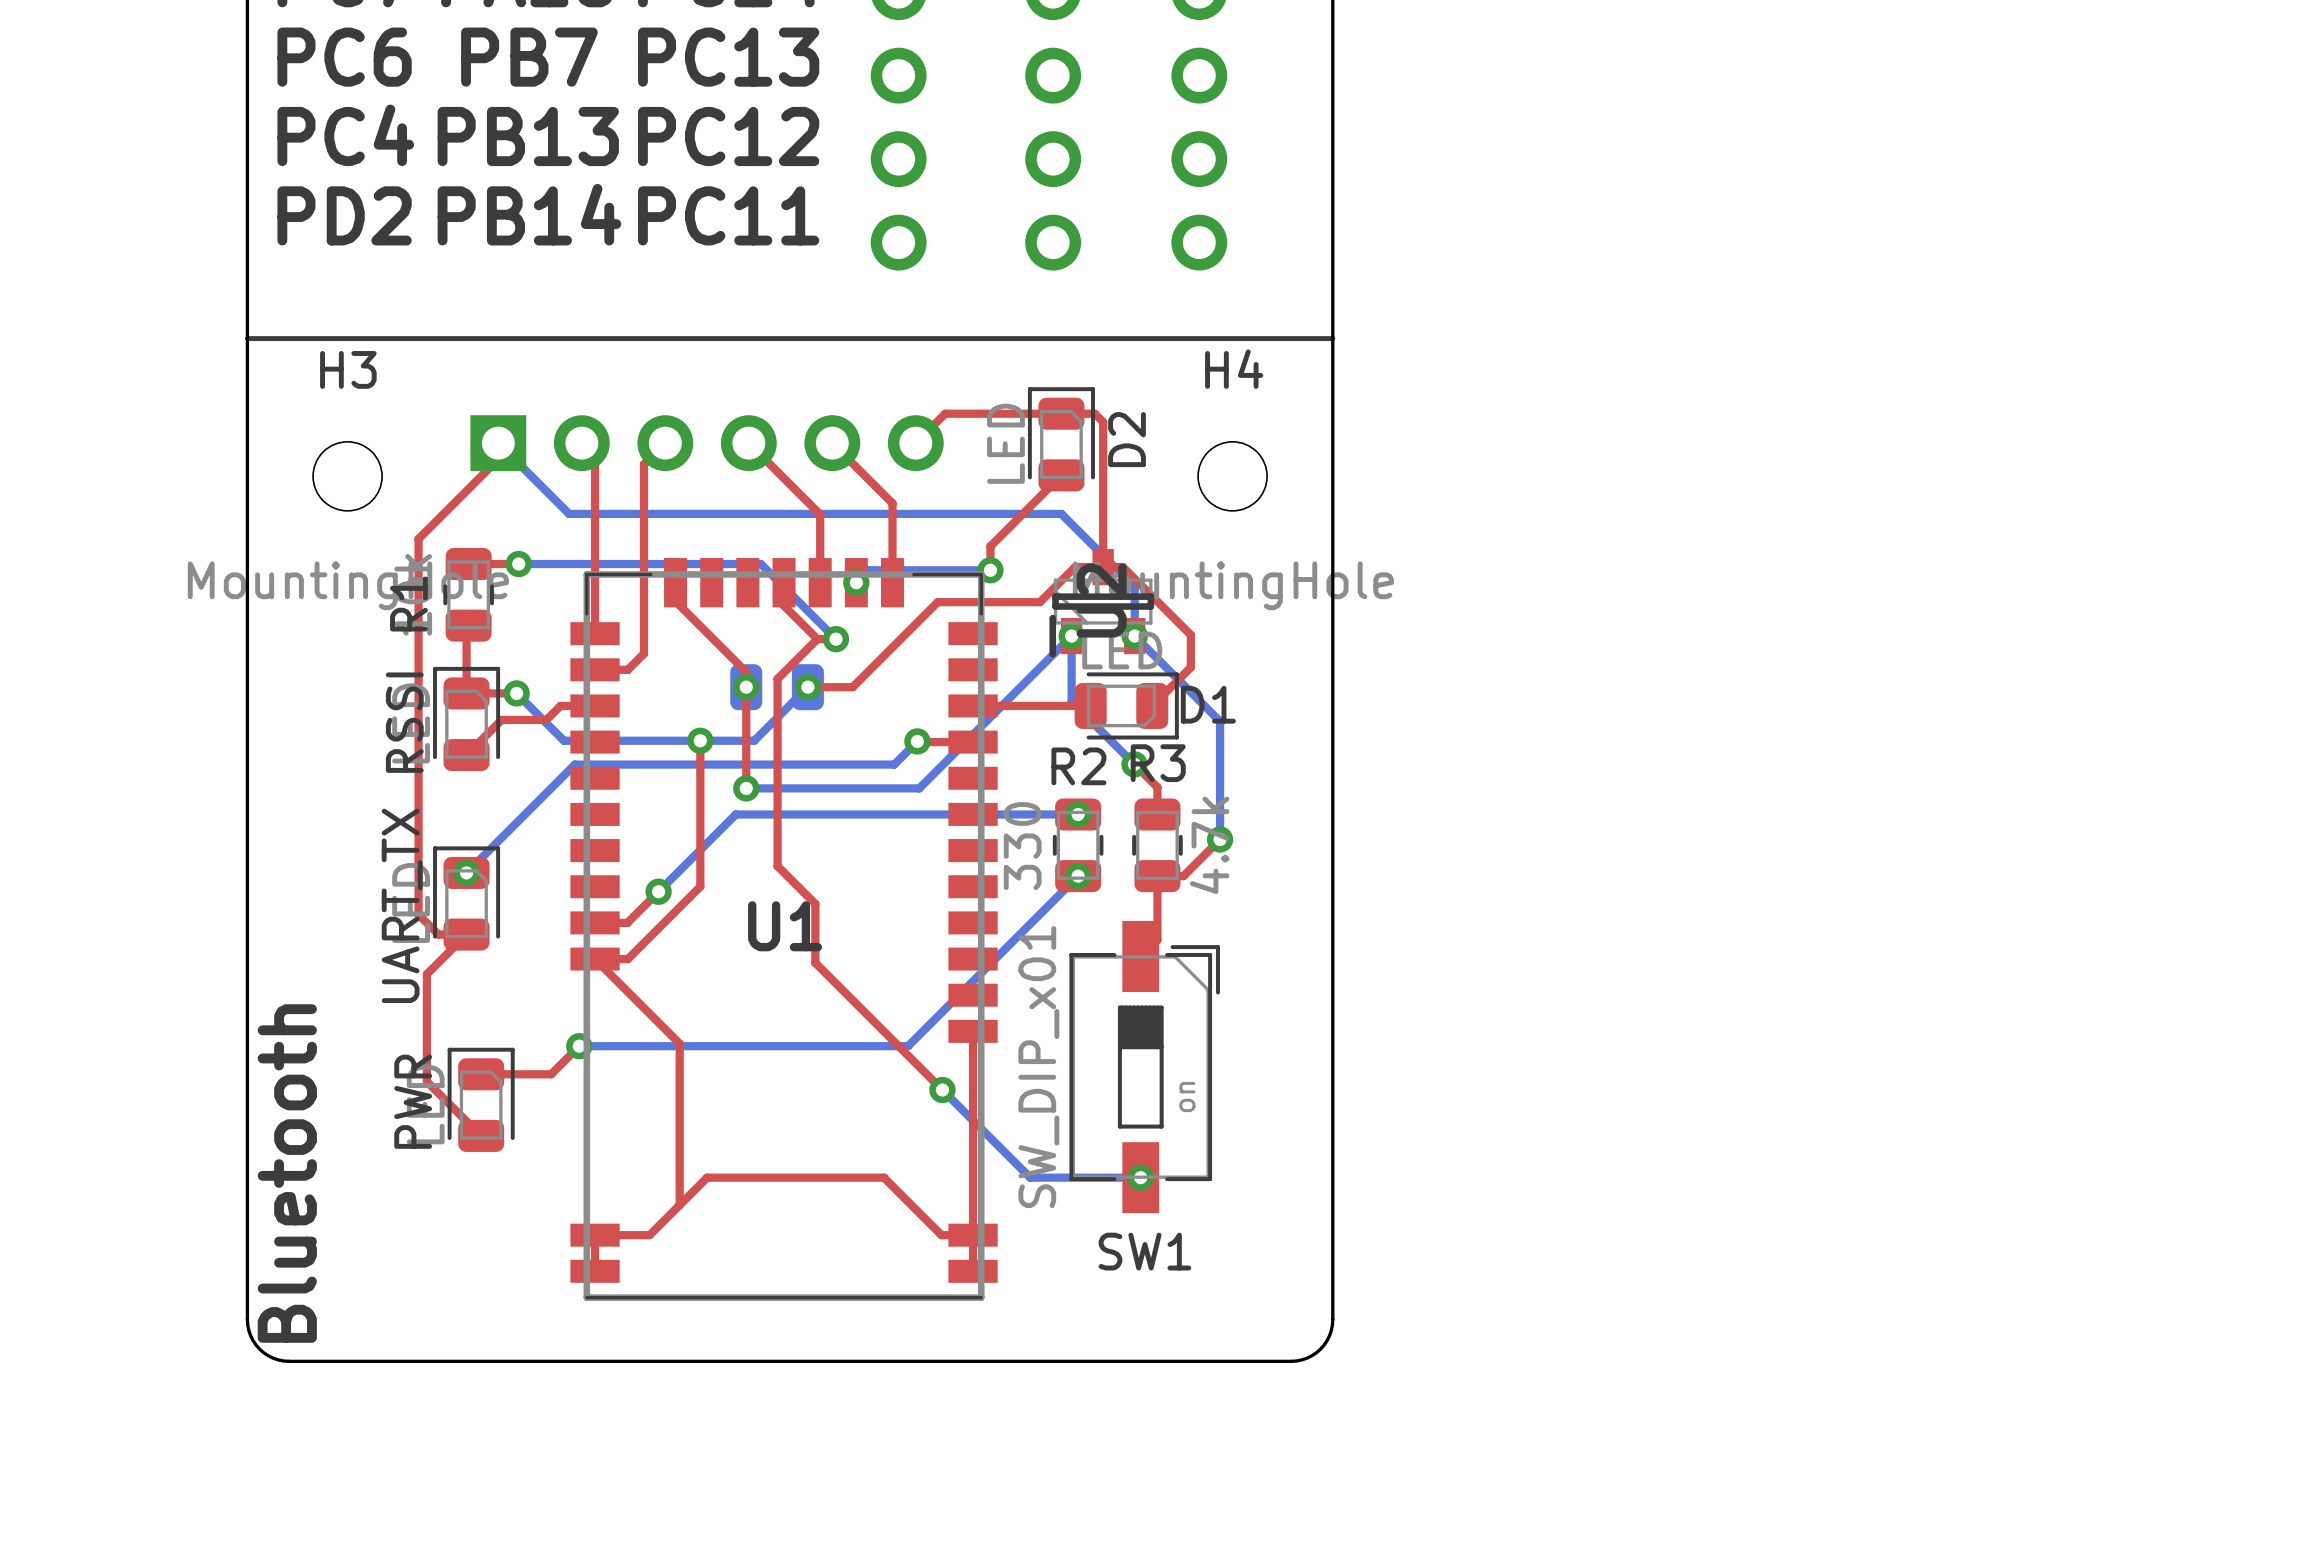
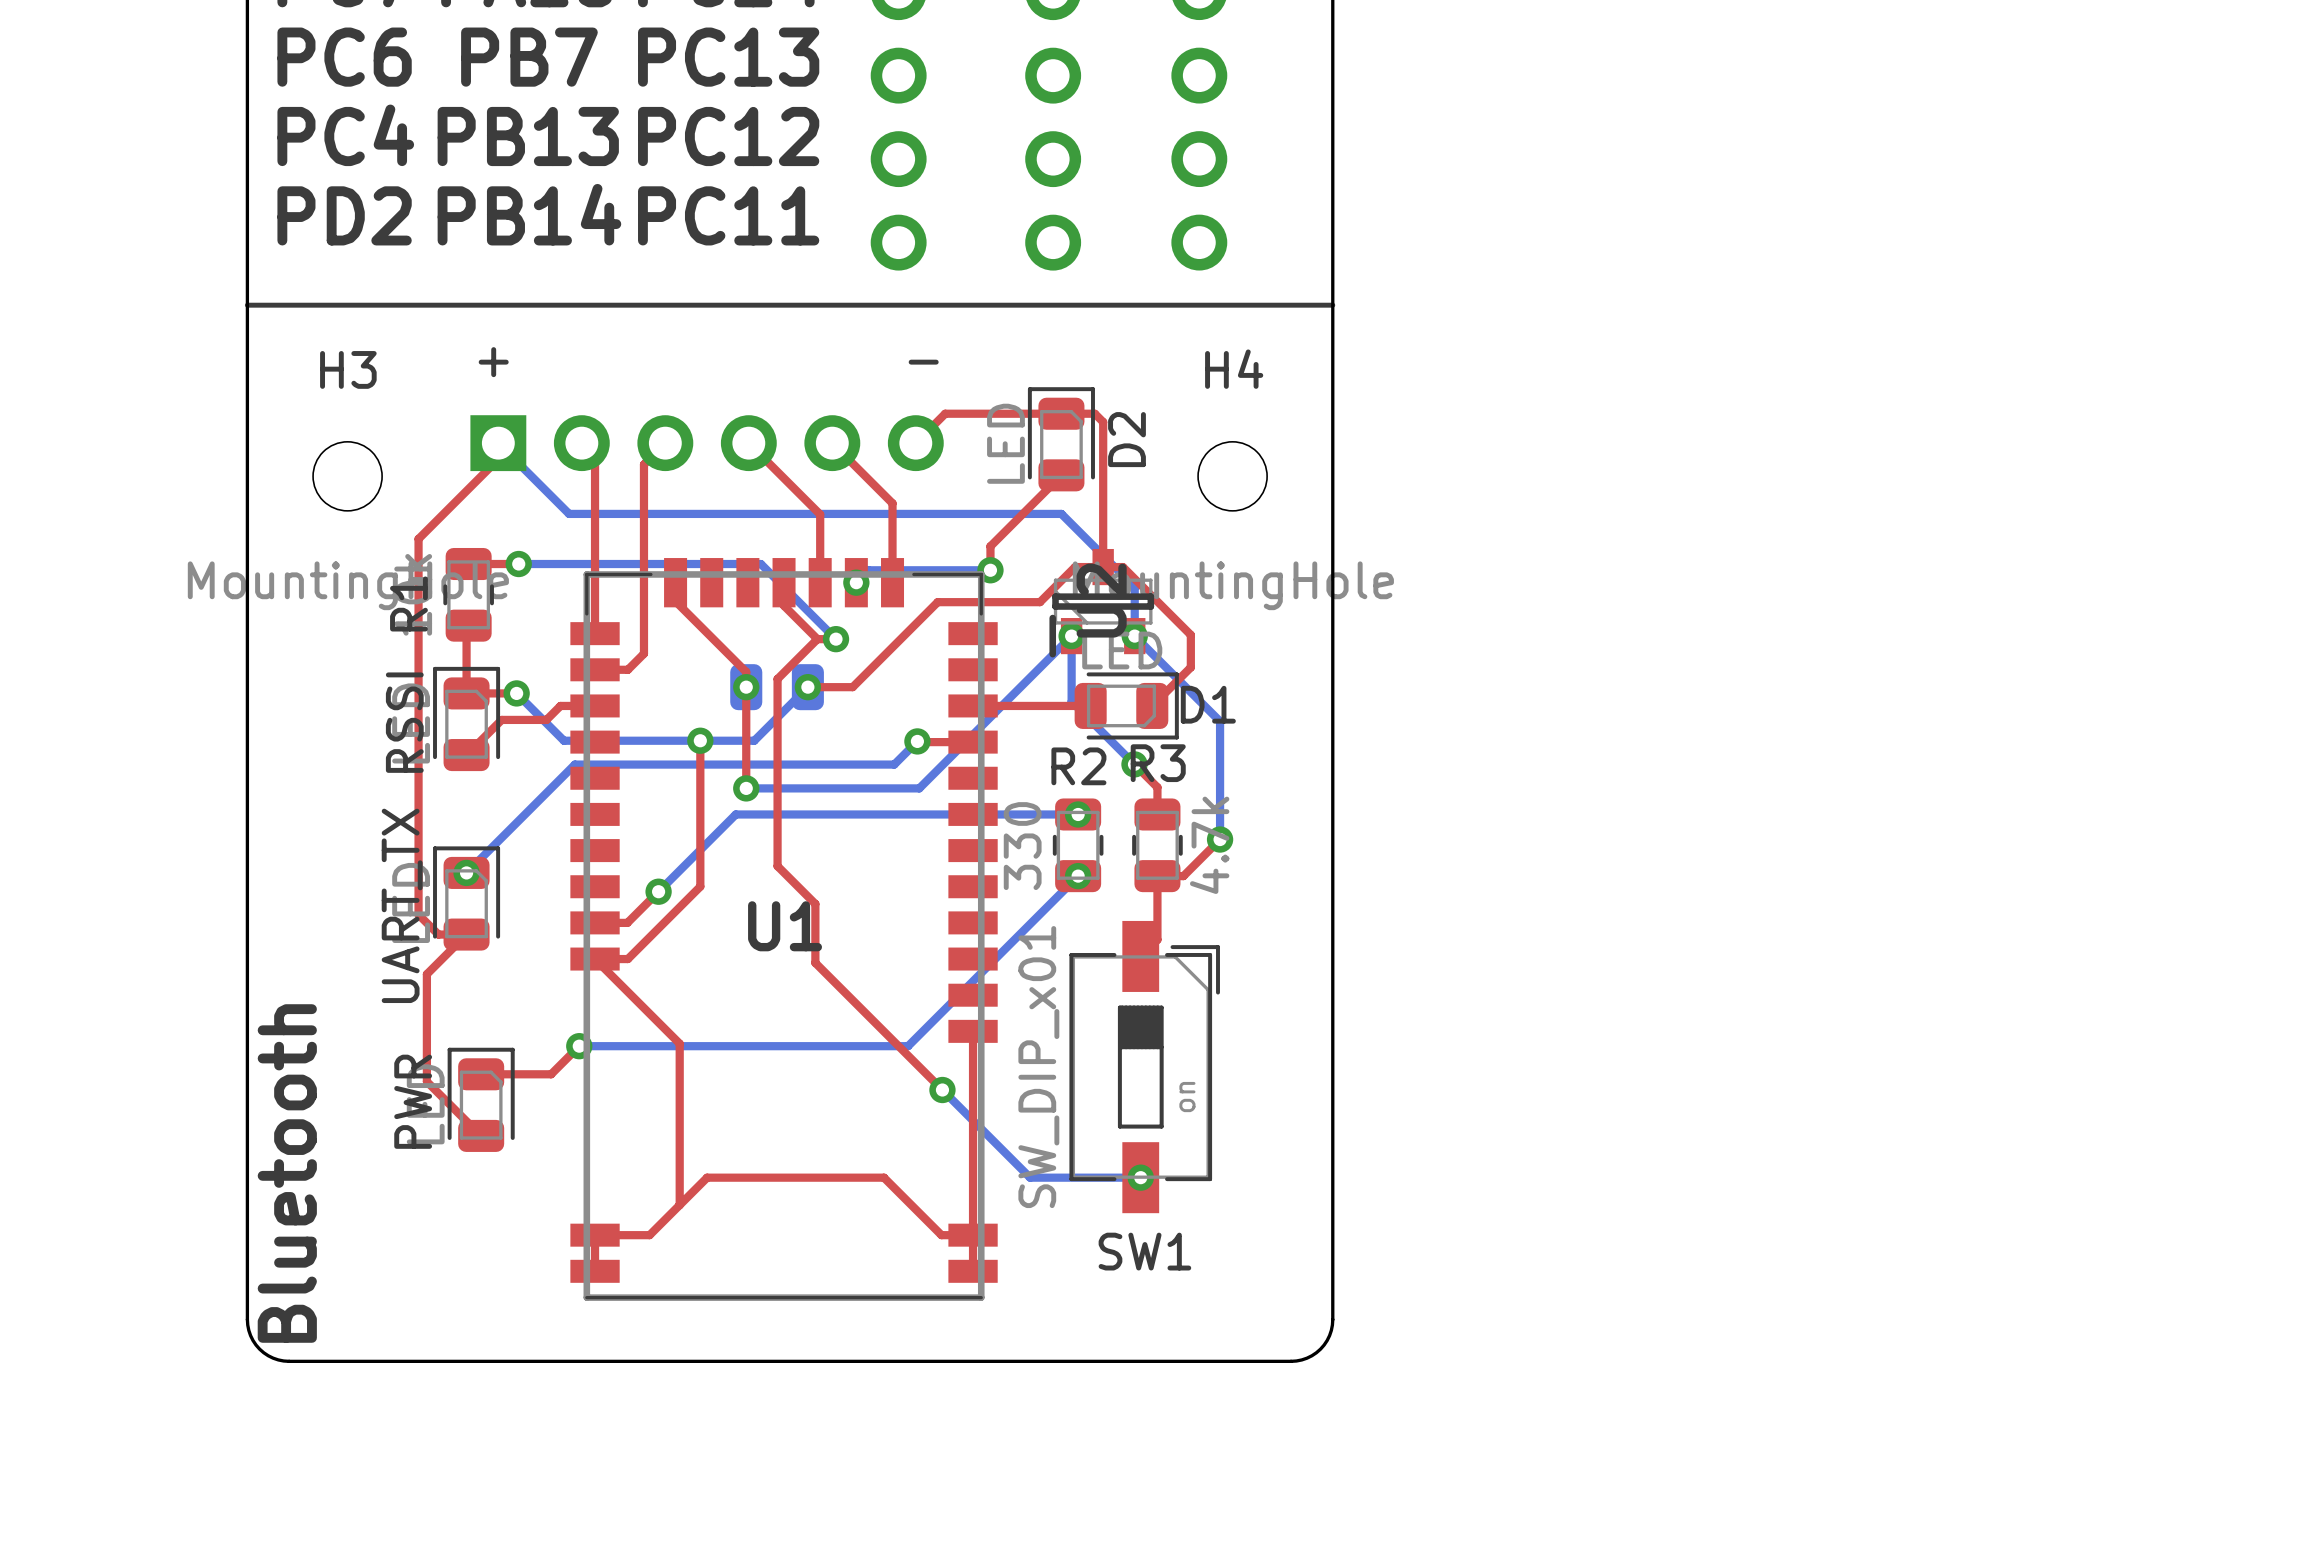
line: (247, 338) (1332, 338) -> (247, 305) (1332, 305)
text: none -> + (493, 362)
text: none -> - (923, 362)

